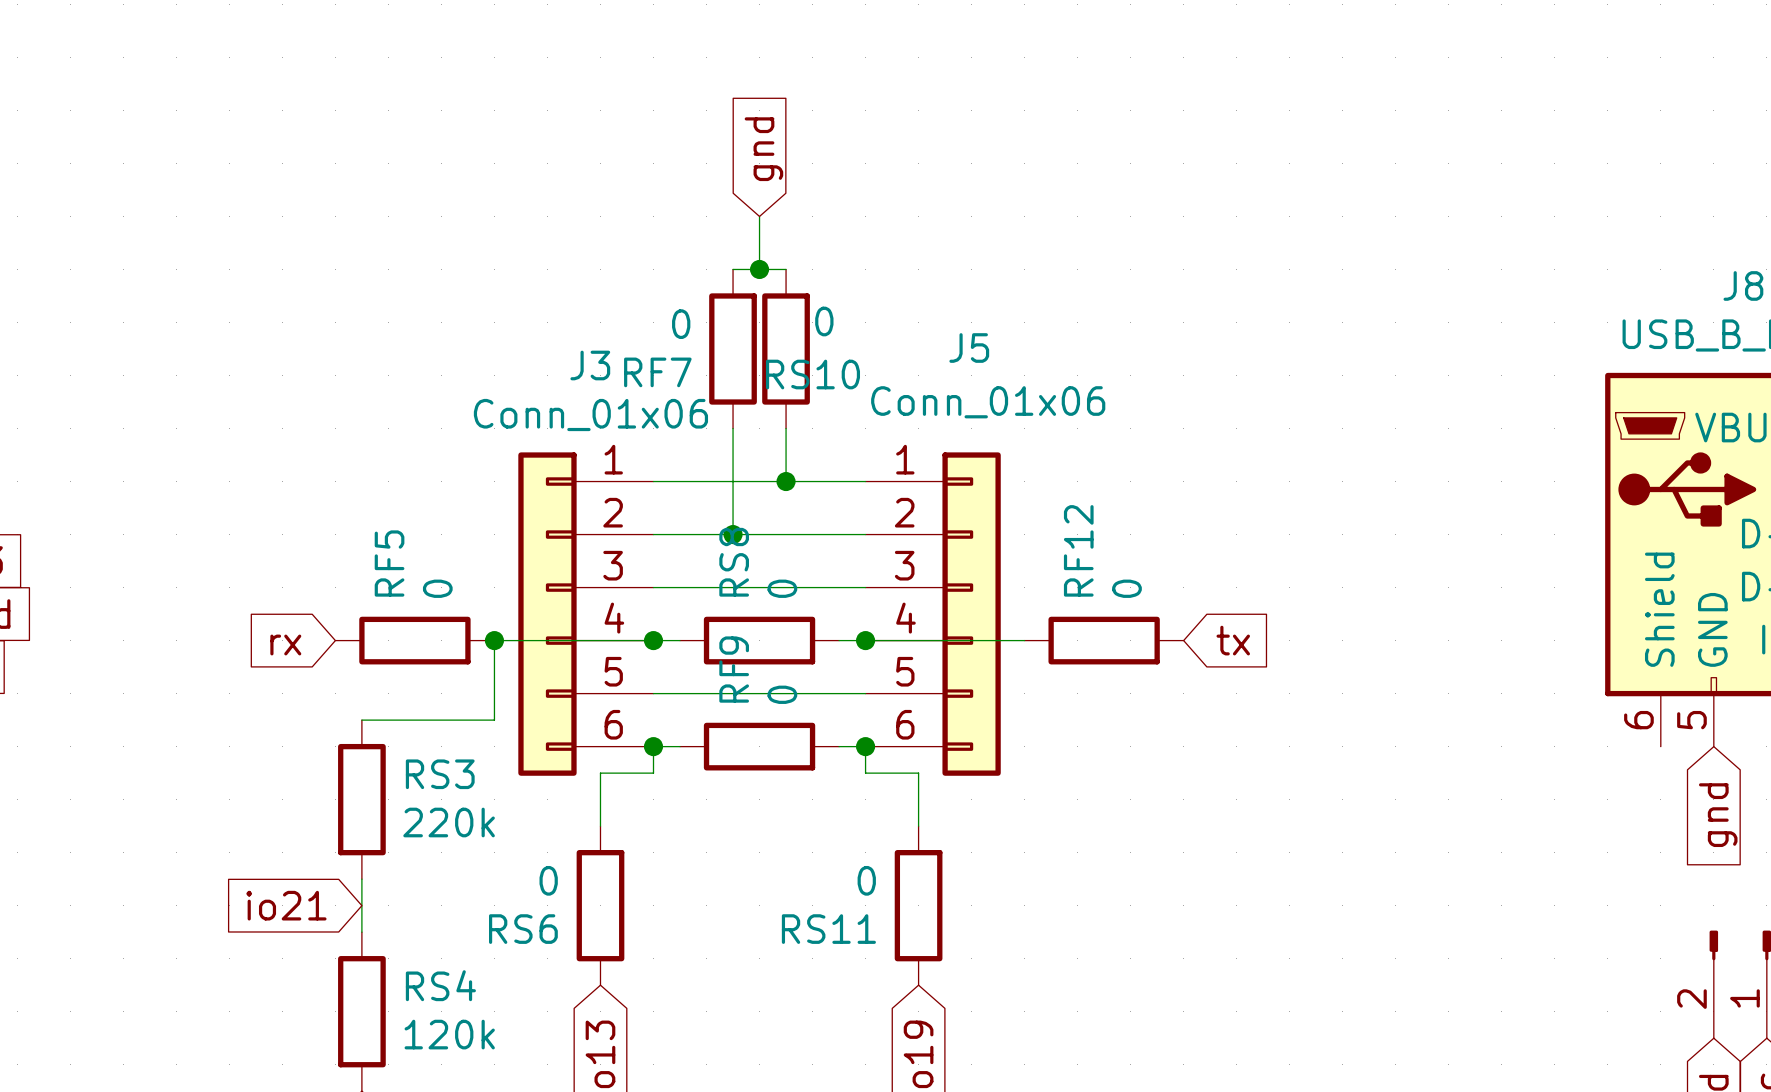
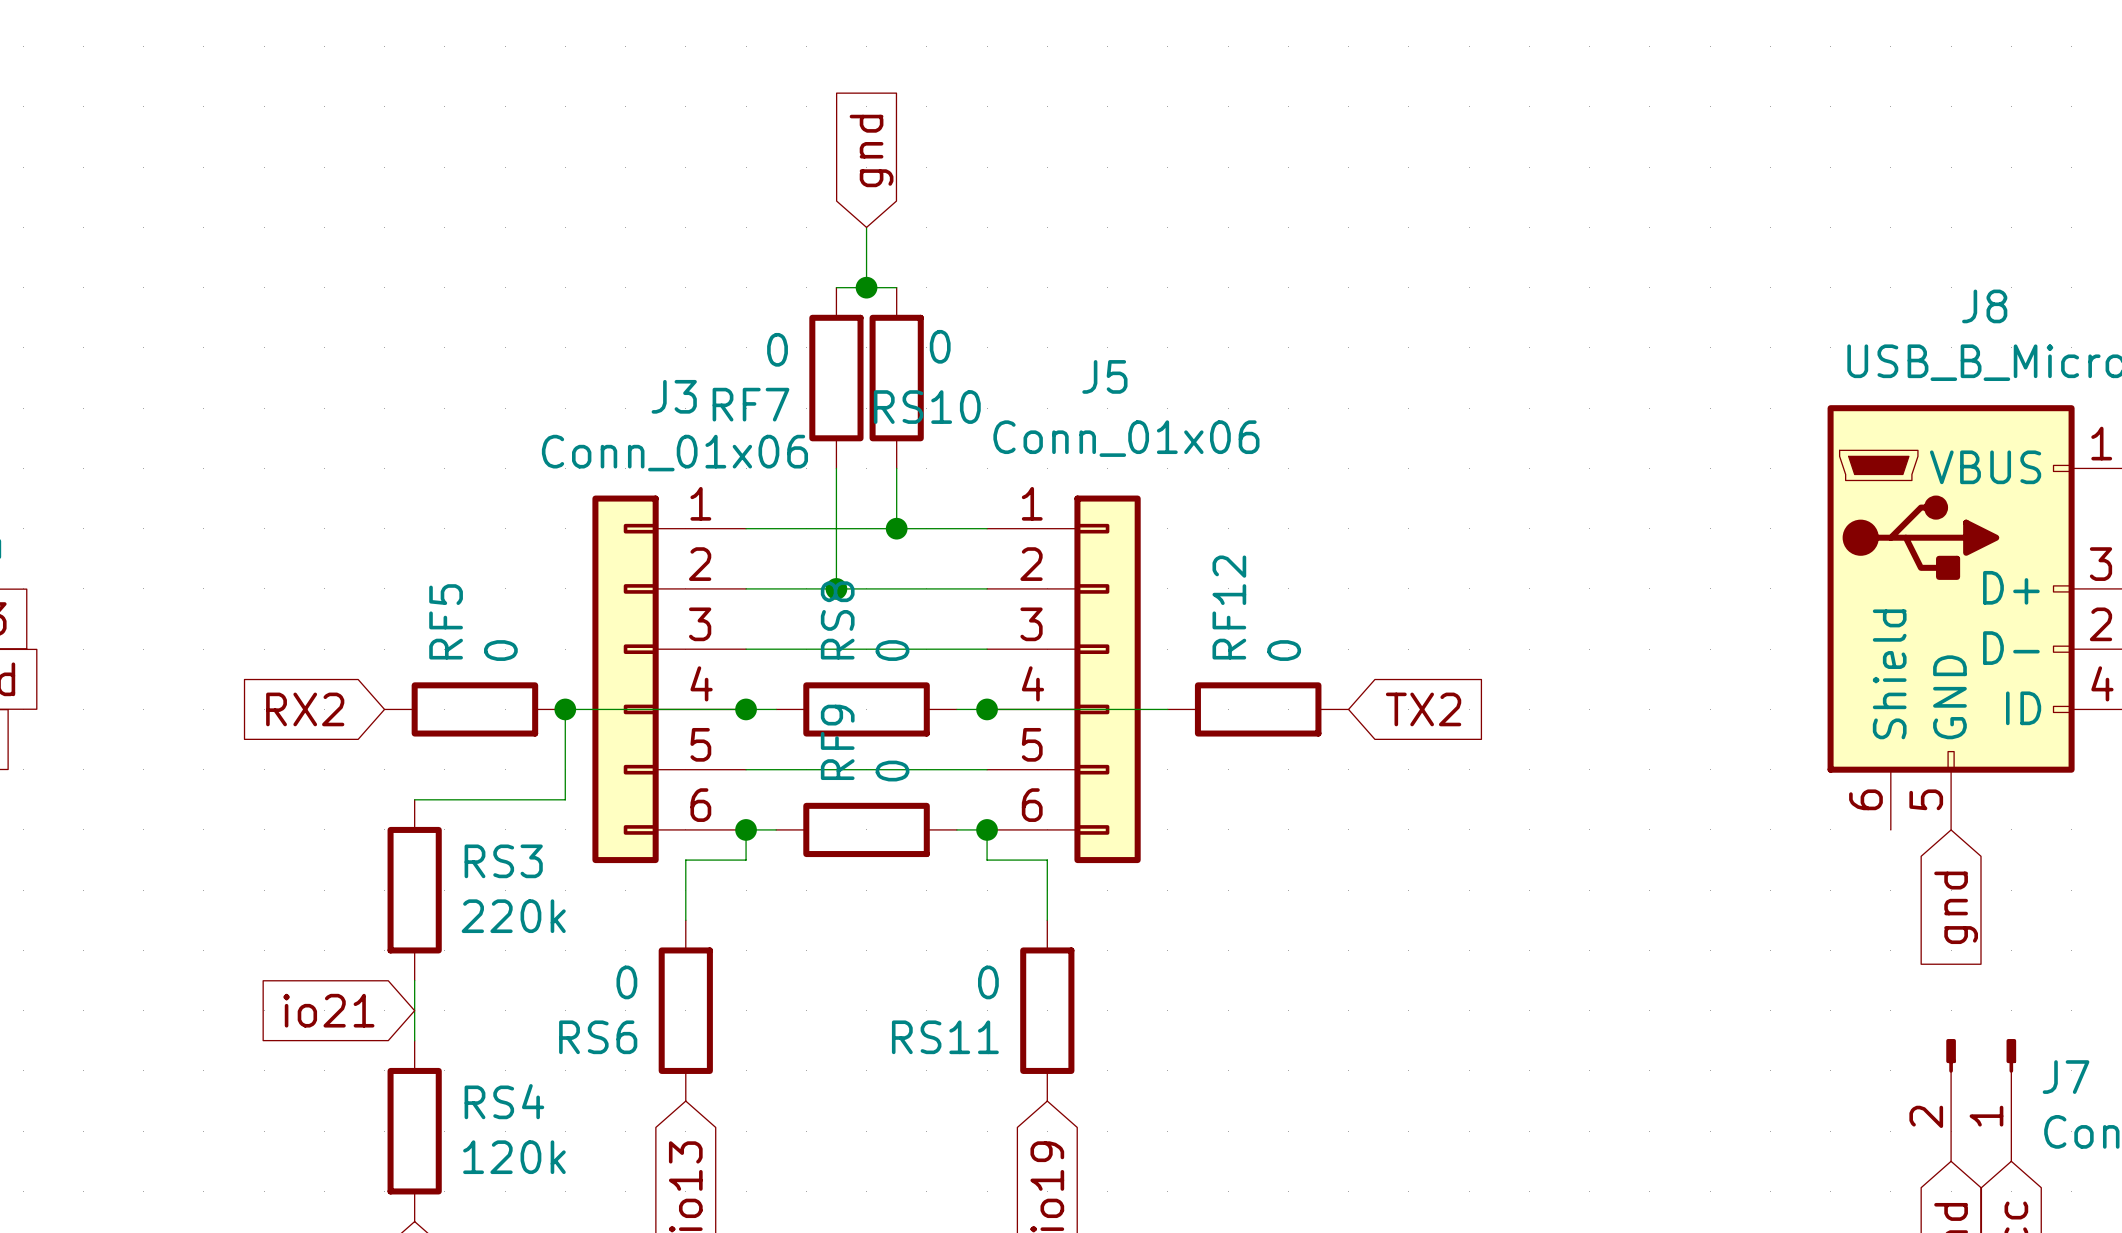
global label: tx (1233, 640) -> TX2 (1423, 709)
global label: rx (285, 645) -> RX2 (305, 709)

